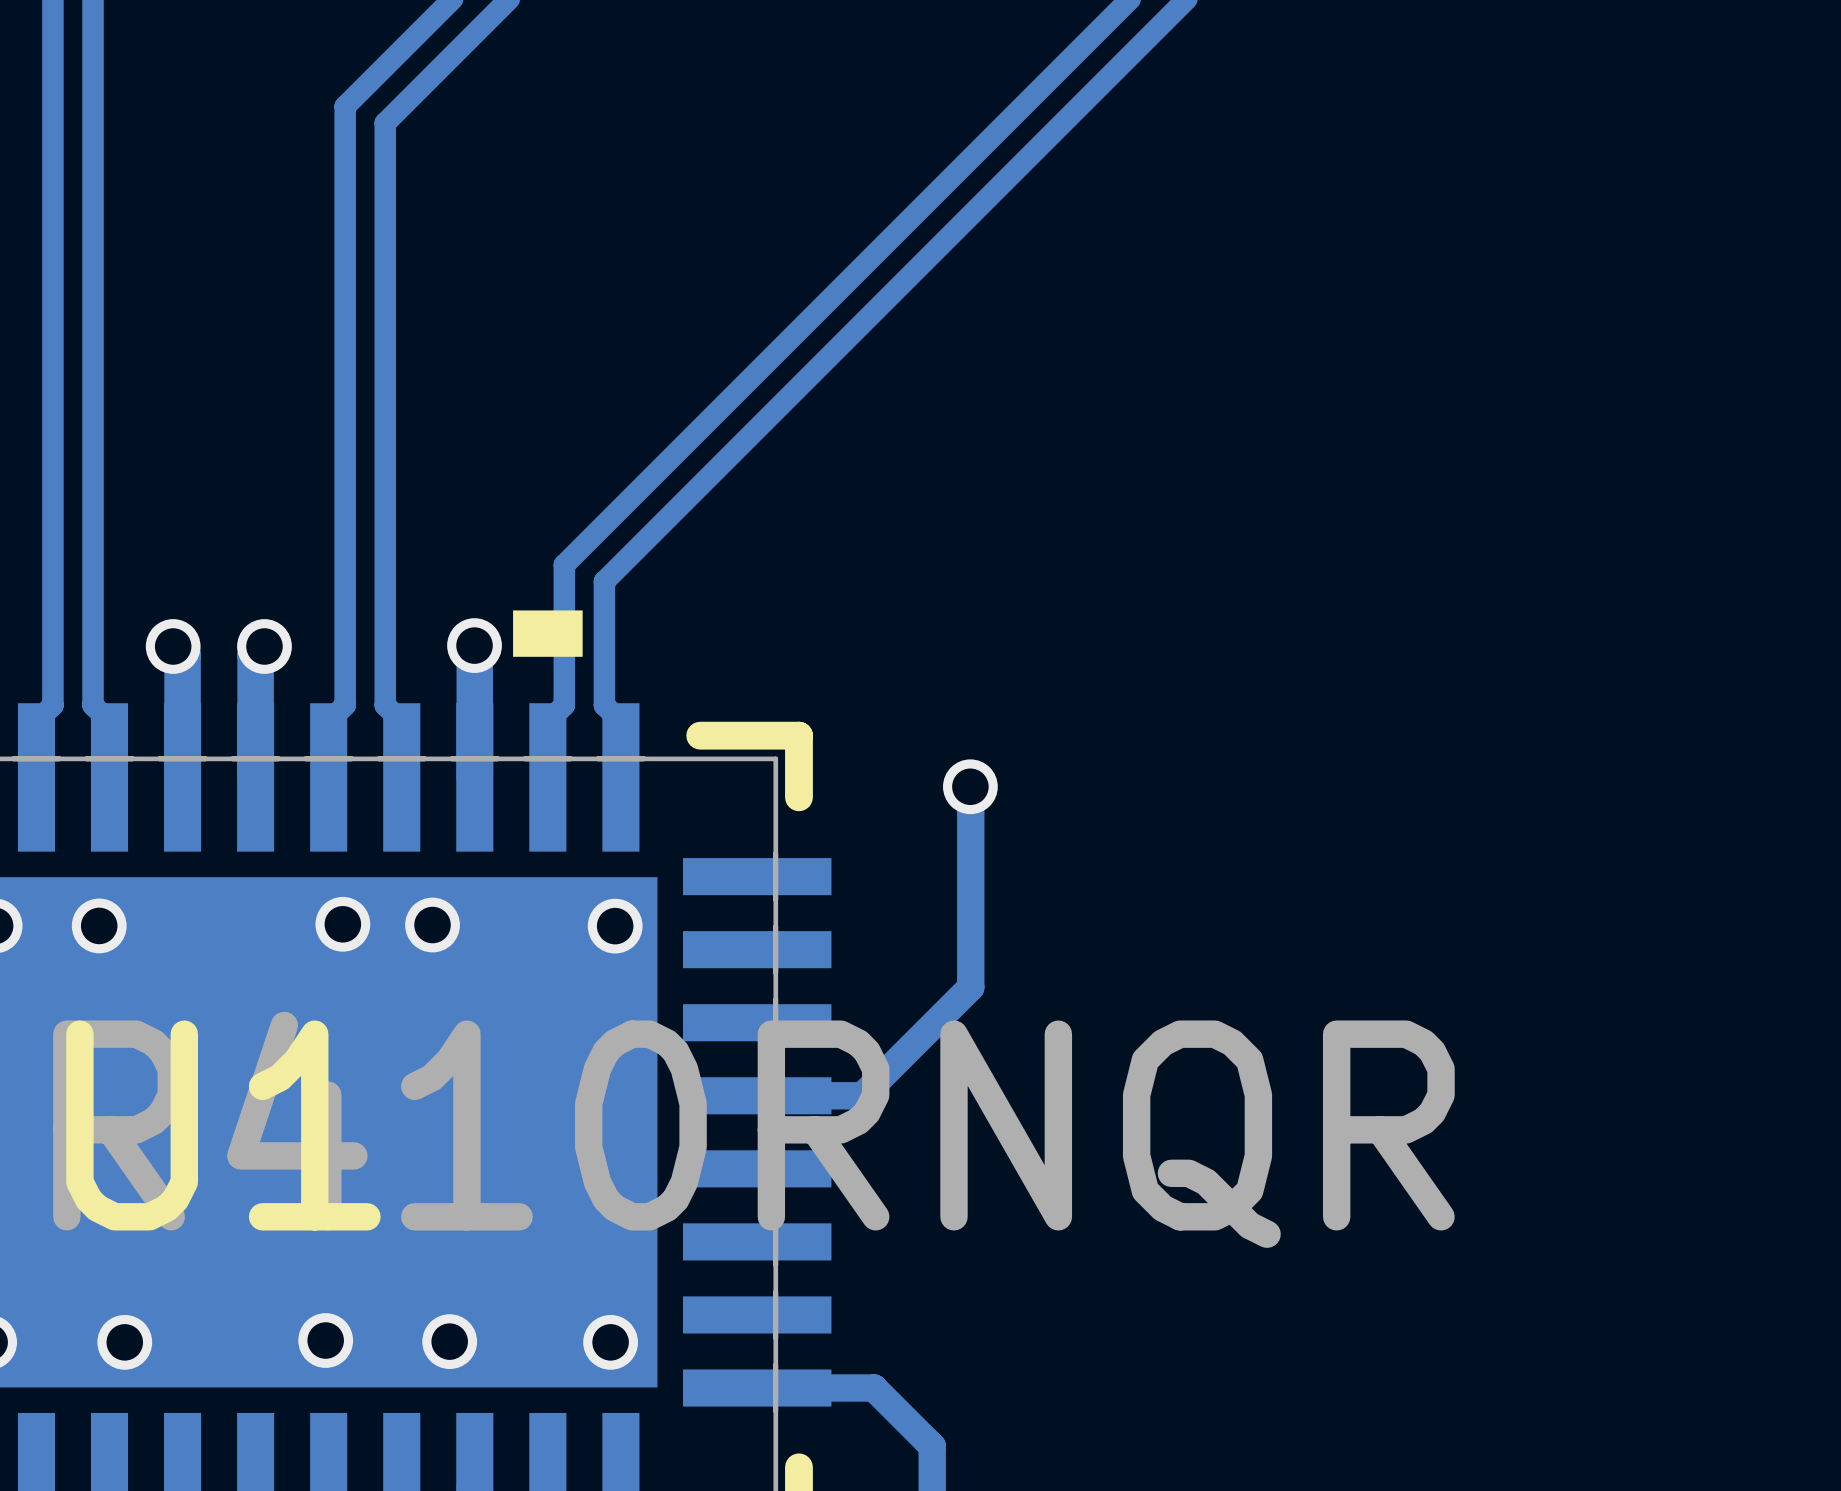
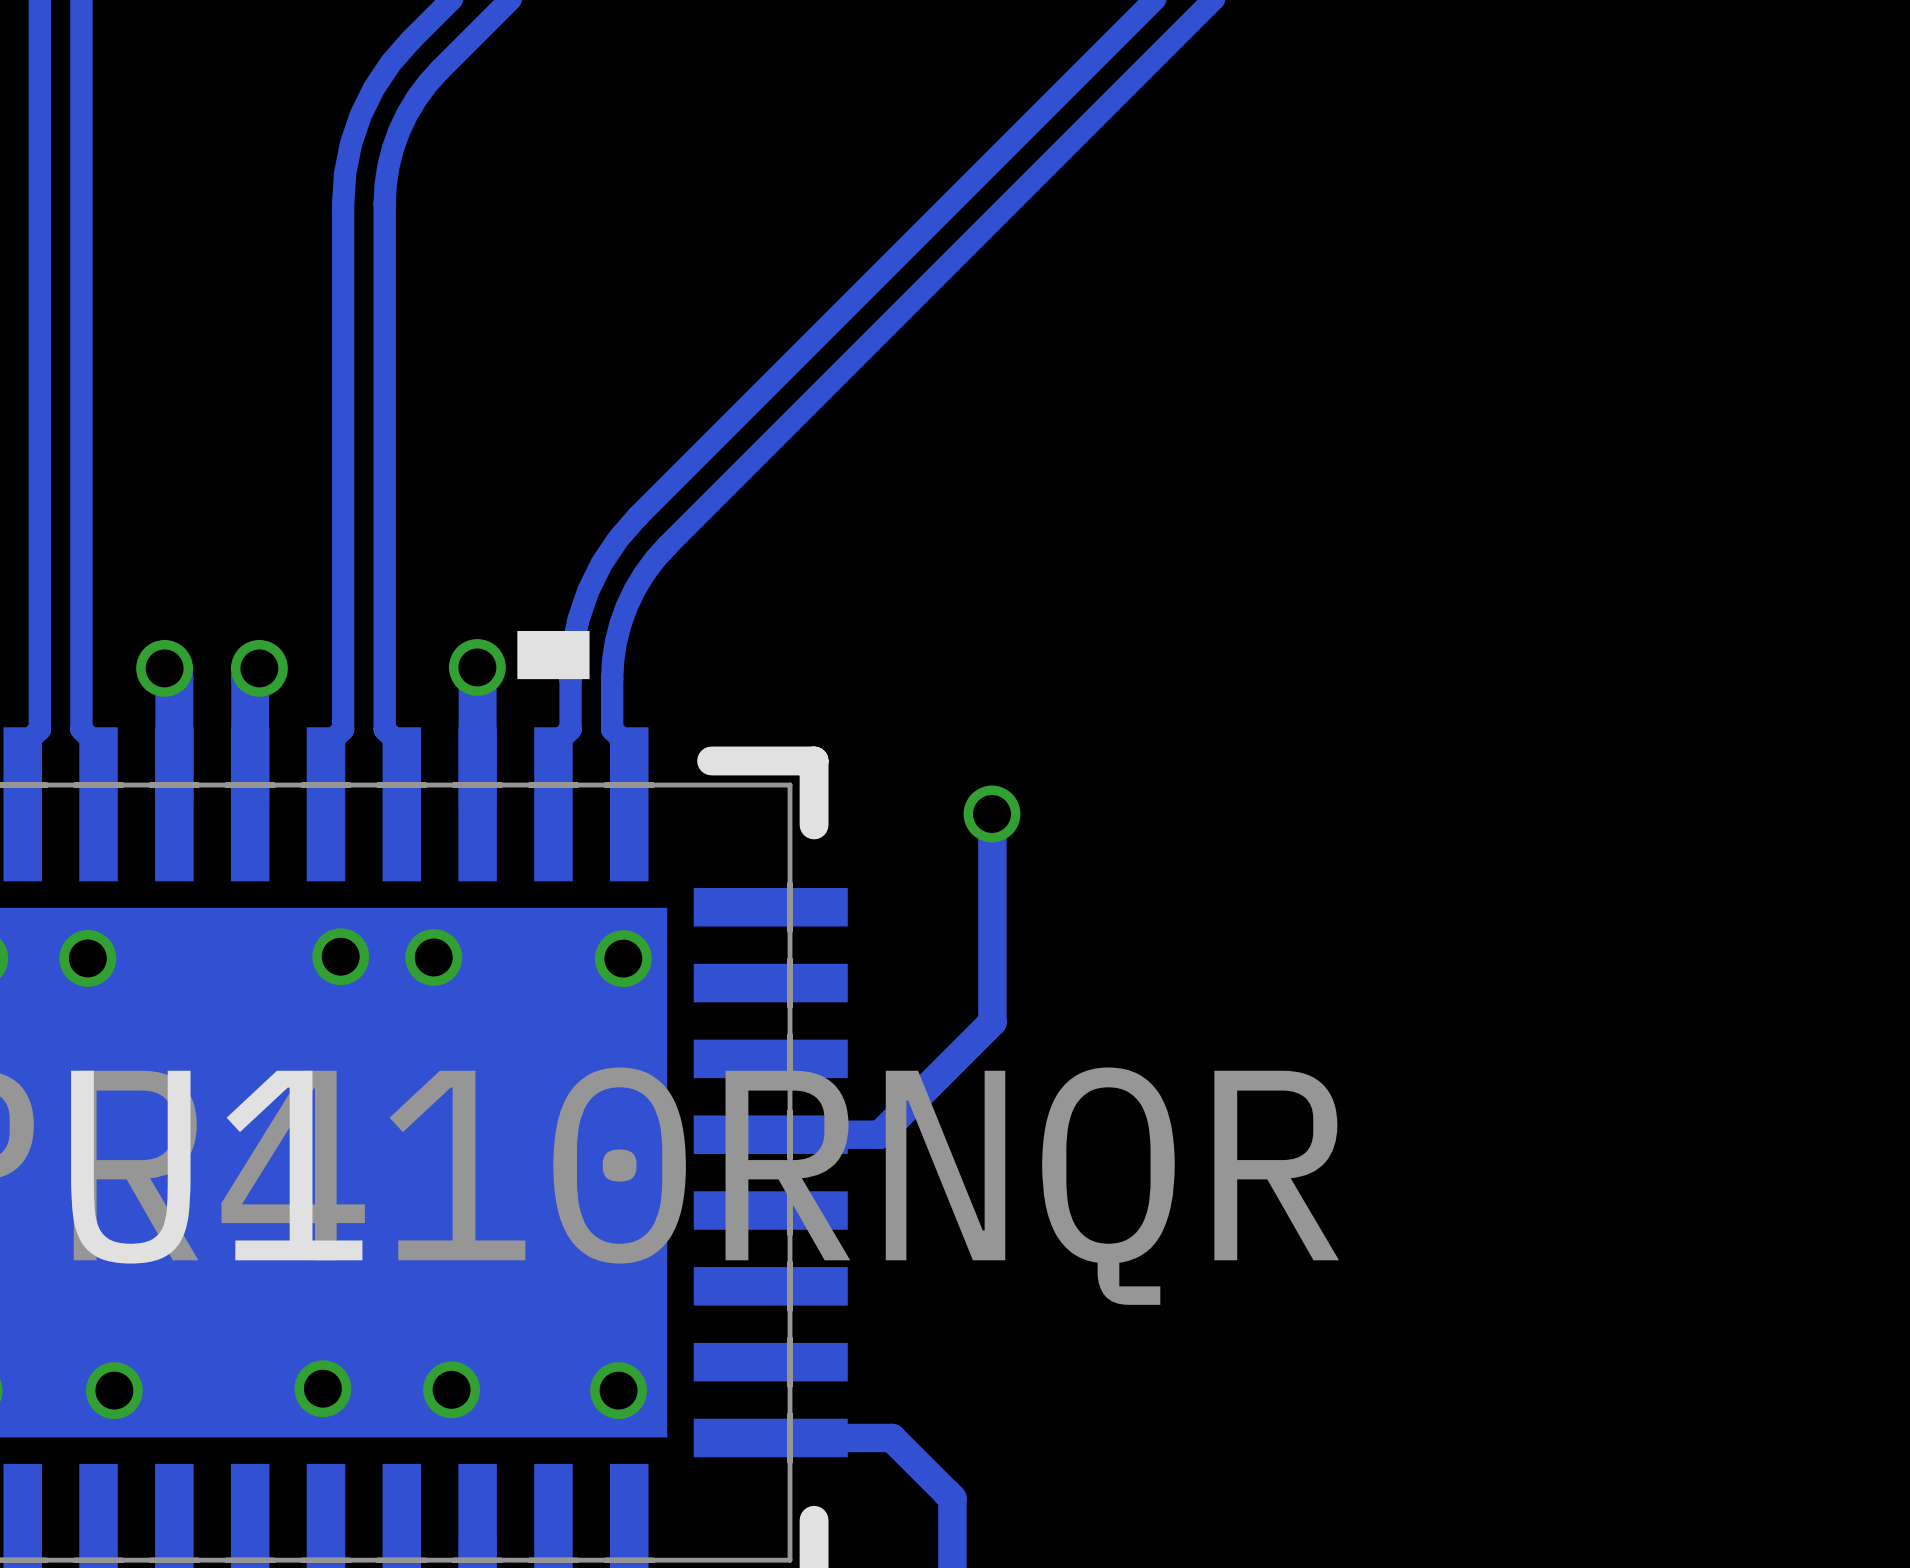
track: (410, 41) (345, 106) (345, 198) -> (410, 40) (390, 63) (374, 88) (360, 115) (350, 143) (345, 173) (343, 203)
track: (438, 69) (385, 123) (385, 198) -> (440, 69) (416, 98) (399, 131) (388, 166) (384, 203)
track: (629, 499) (564, 564) (564, 657) -> (638, 516) (618, 538) (601, 563) (588, 591) (578, 619) (572, 649) (570, 679)
track: (657, 528) (604, 581) (604, 657) -> (667, 545) (644, 574) (626, 606) (615, 642) (612, 679)

